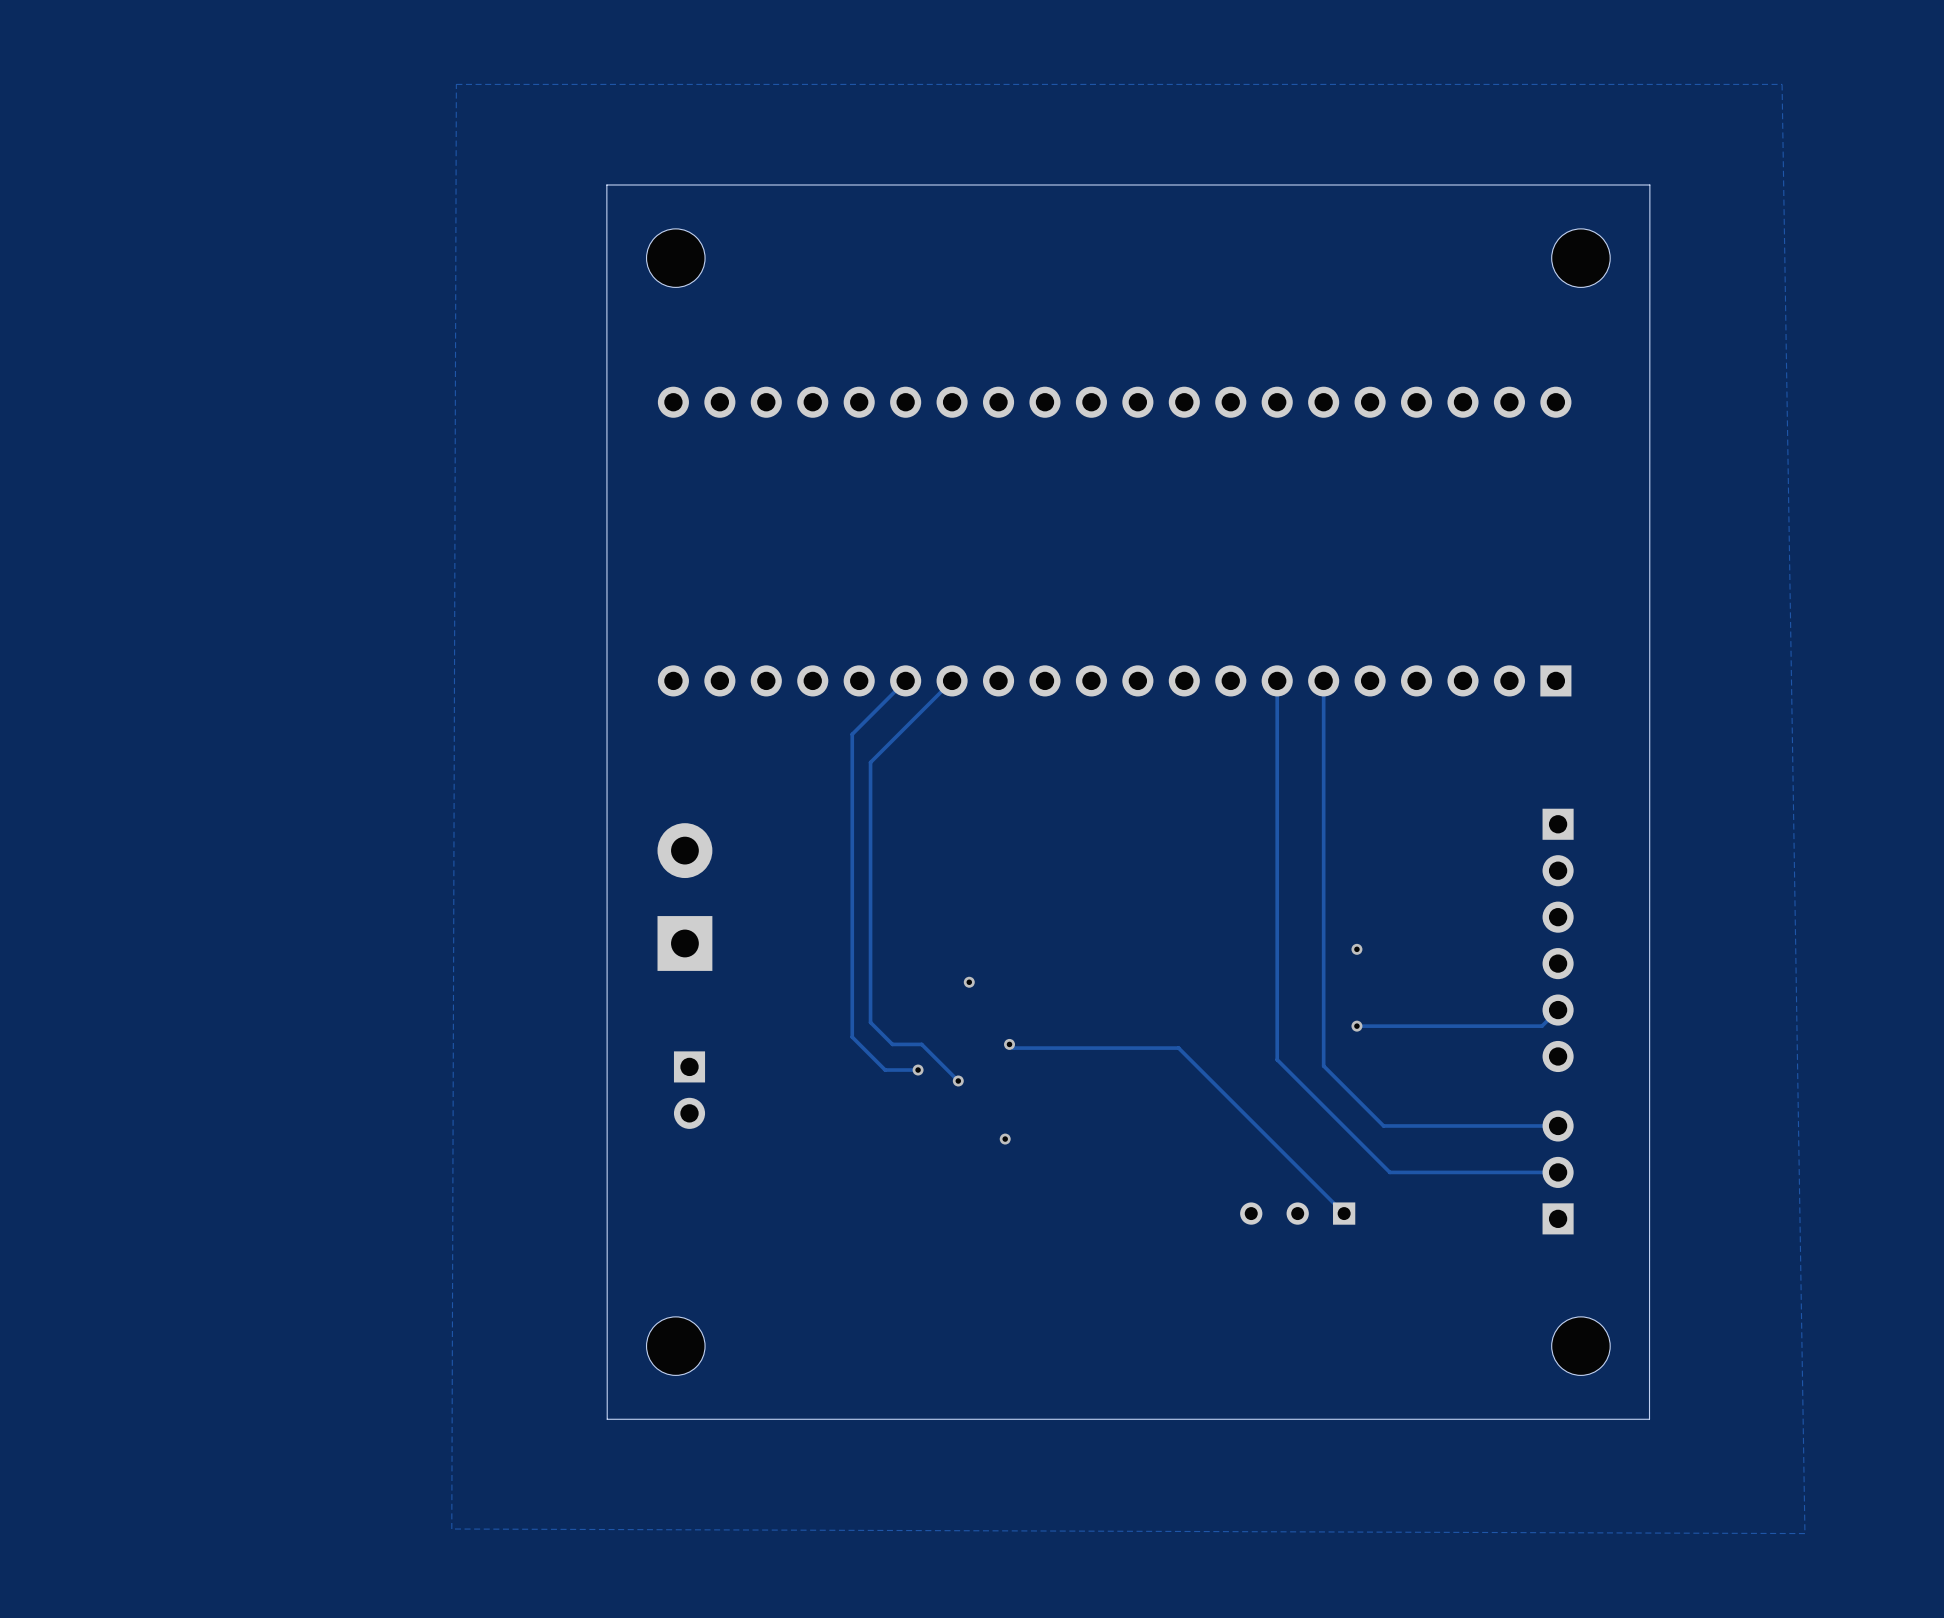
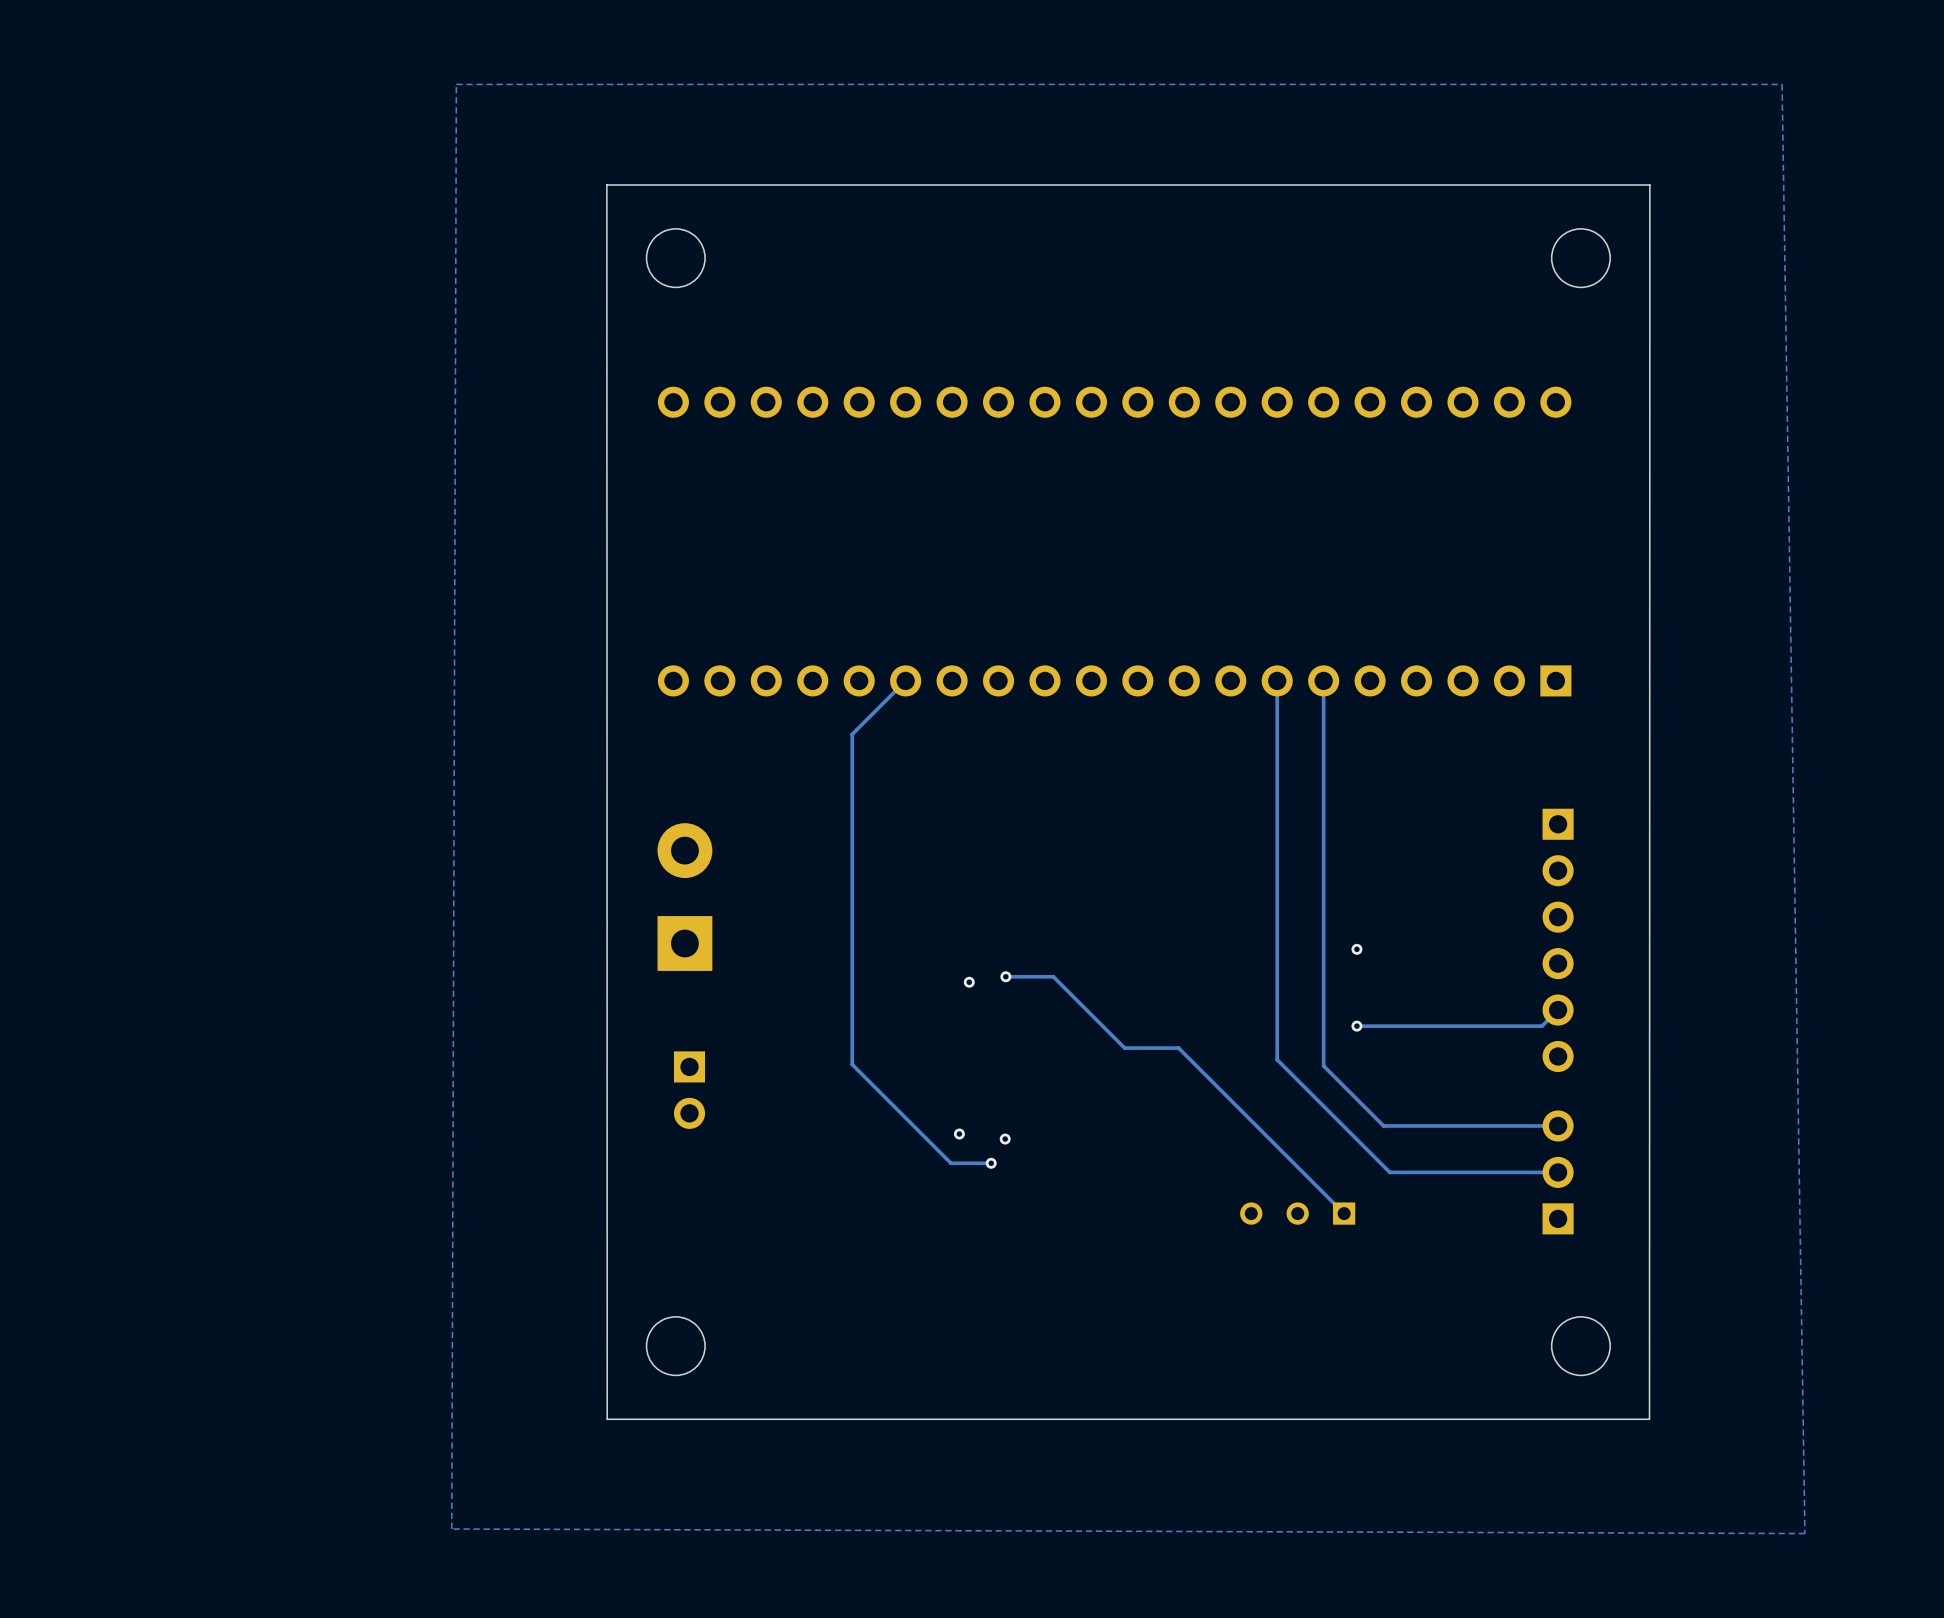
track: (952, 680) (870, 762) (870, 1022) (892, 1044) (921, 1044) (958, 1080) -> none
via: none -> (1005, 976)
track: (852, 1037) (885, 1070) (918, 1070) -> (852, 1037) (852, 1064) (950, 1163) (991, 1163)
track: (1009, 1044) (1013, 1048) (1124, 1048) -> (1005, 976) (1053, 976) (1124, 1048)
via: (1009, 1044) -> none
via: (918, 1070) -> none
via: (958, 1080) -> none
via: none -> (959, 1134)
via: none -> (991, 1163)

